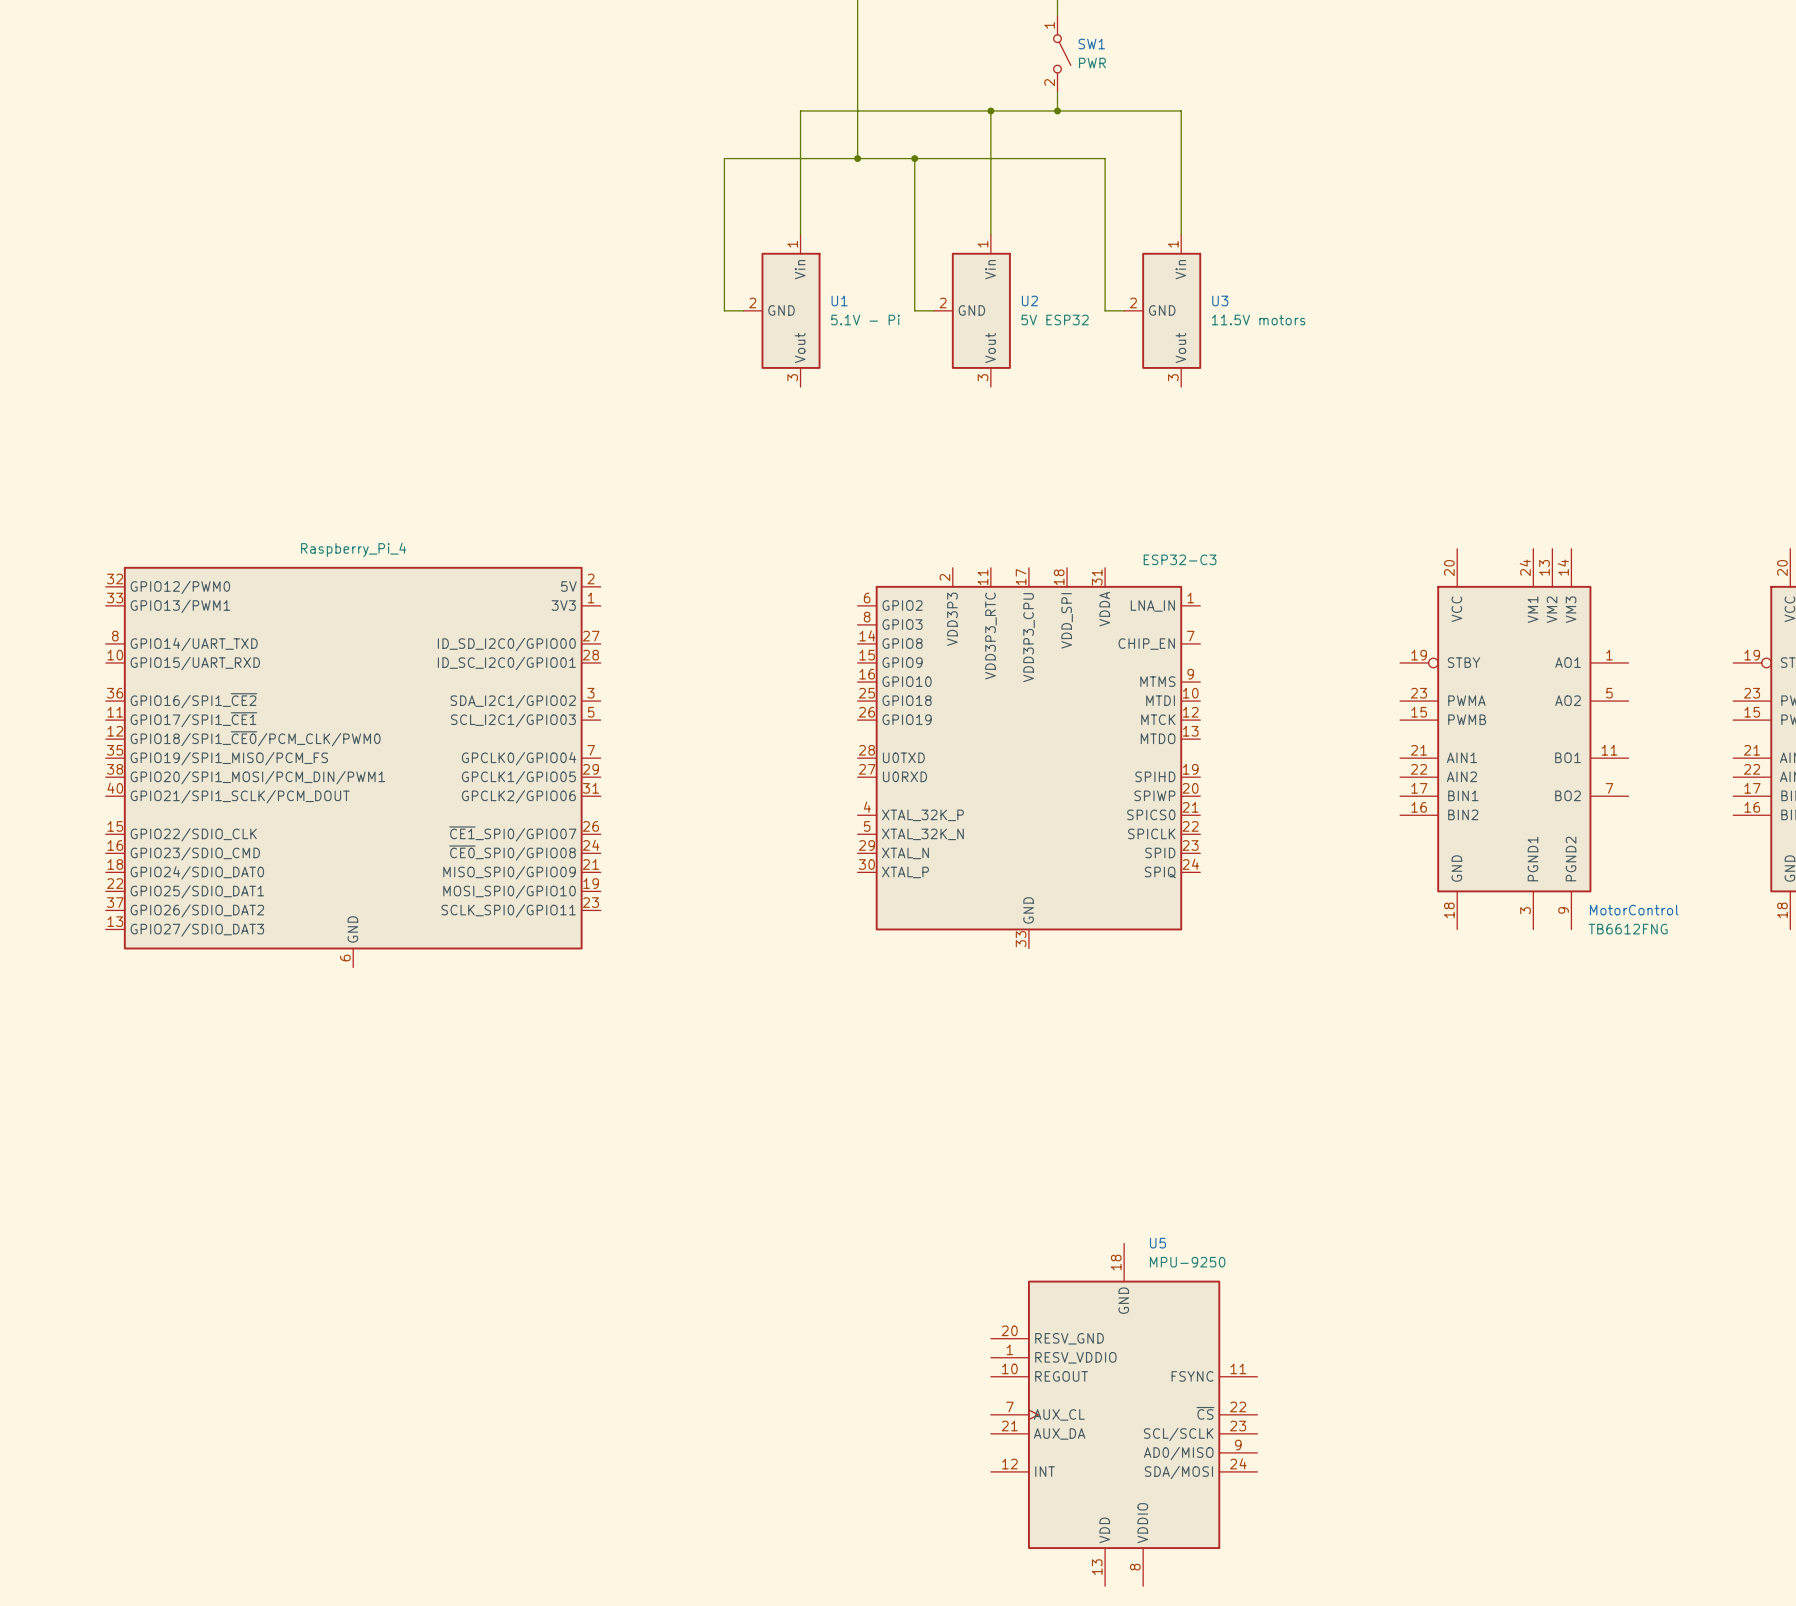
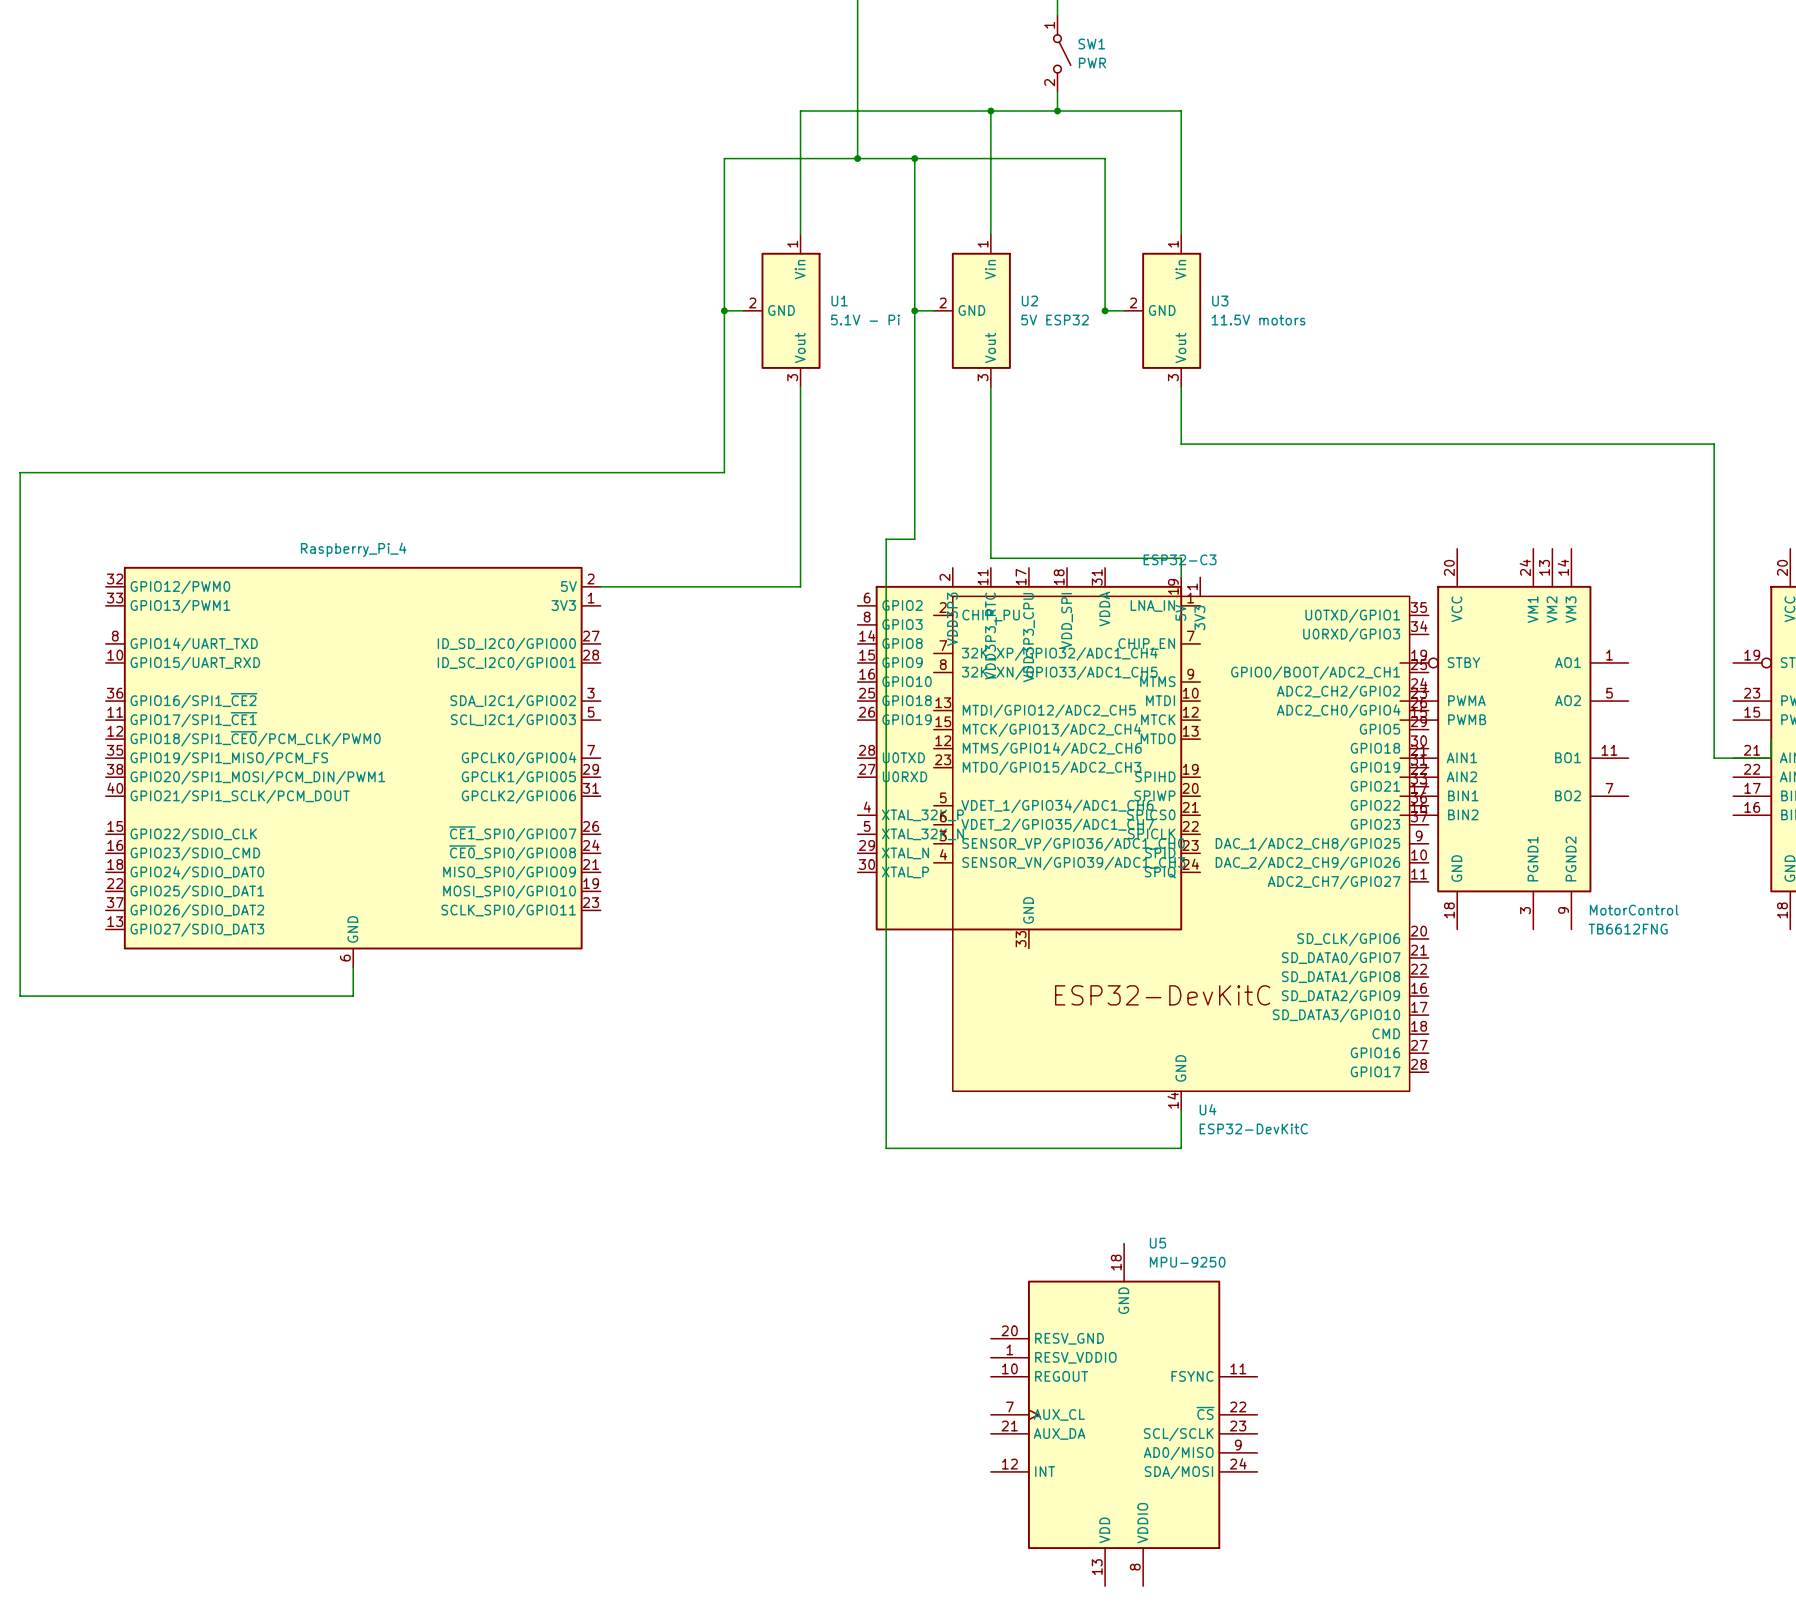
wire: none -> (724, 310) (724, 472) (20, 472) (20, 996) (353, 996) (353, 967)
junction: none -> (724, 310)
wire: none -> (914, 310) (914, 539) (886, 539) (886, 1148) (1181, 1148) (1181, 1110)
junction: none -> (914, 310)
junction: none -> (1105, 310)
wire: none -> (800, 386) (800, 586) (600, 586)
wire: none -> (990, 386) (990, 558) (1181, 558) (1181, 577)
wire: none -> (1181, 386) (1181, 444) (1714, 444) (1714, 758) (1771, 758) (1771, 739)
U4: none -> ESP32-DevKitC (1181, 843)

